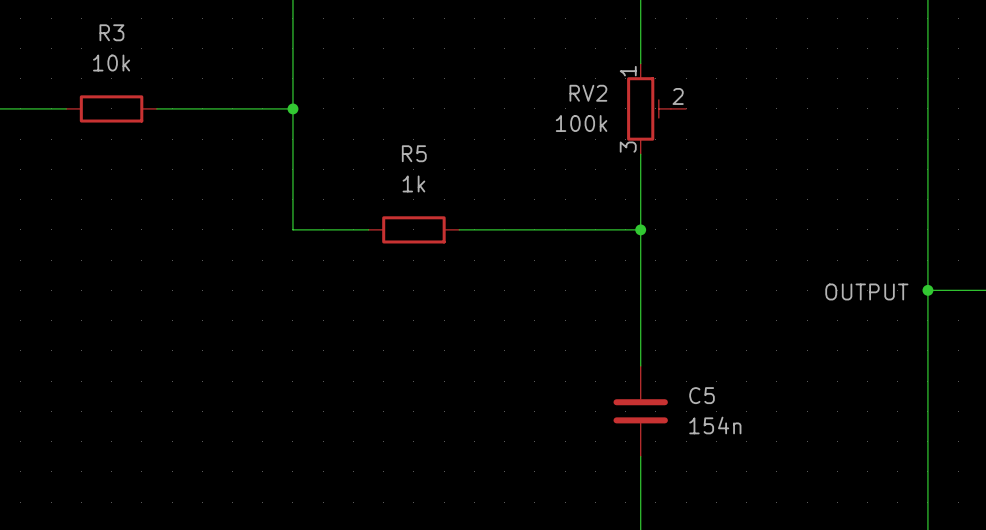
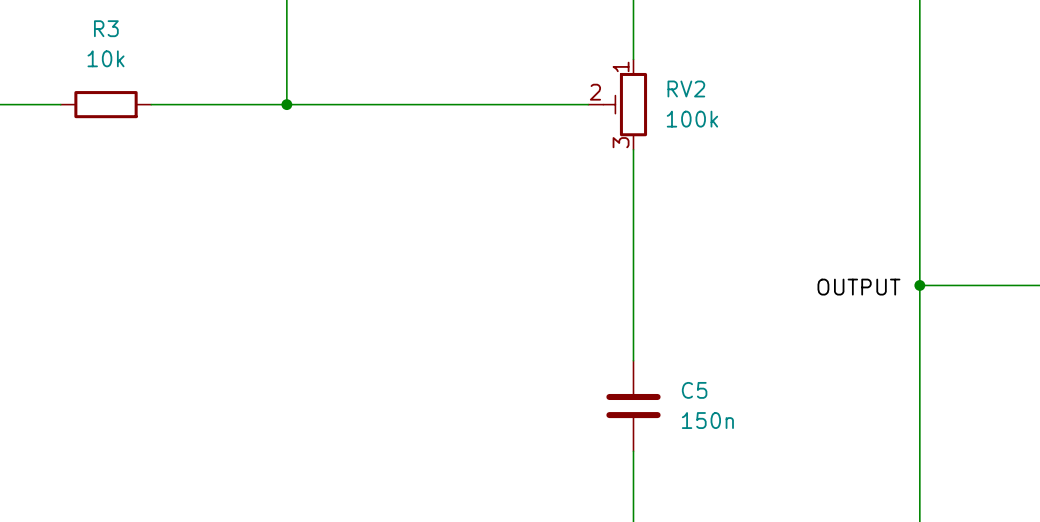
wire: (292, 108) (292, 229) (368, 229) -> (286, 104) (588, 104)
RV2 flip: as is (649, 108) -> left-right (625, 104)
R5: 1k (413, 229) -> none
wire: (459, 229) (640, 229) -> none
junction: (640, 229) -> none
C5 value: 154n (715, 425) -> 150n (707, 420)

